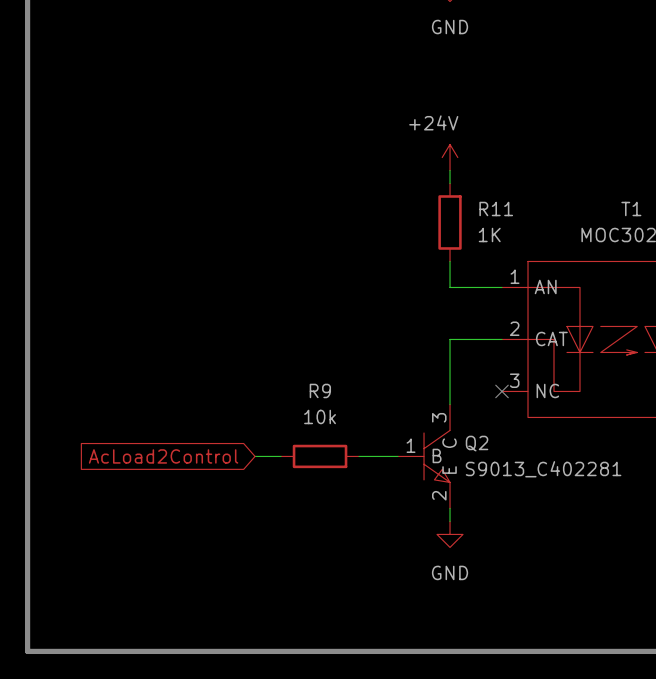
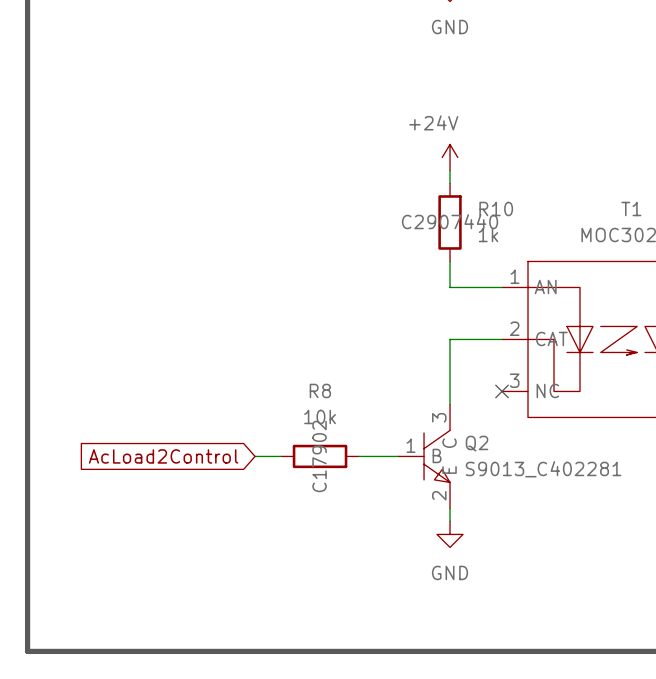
R11 name: R11 (496, 209) -> R10 (496, 209)
R11 text: none -> C2907440 (450, 221)
R11 value: 1K (489, 234) -> 1k (488, 234)
R9 name: R9 (320, 390) -> R8 (320, 390)
R9 text: none -> C17902 (319, 456)

